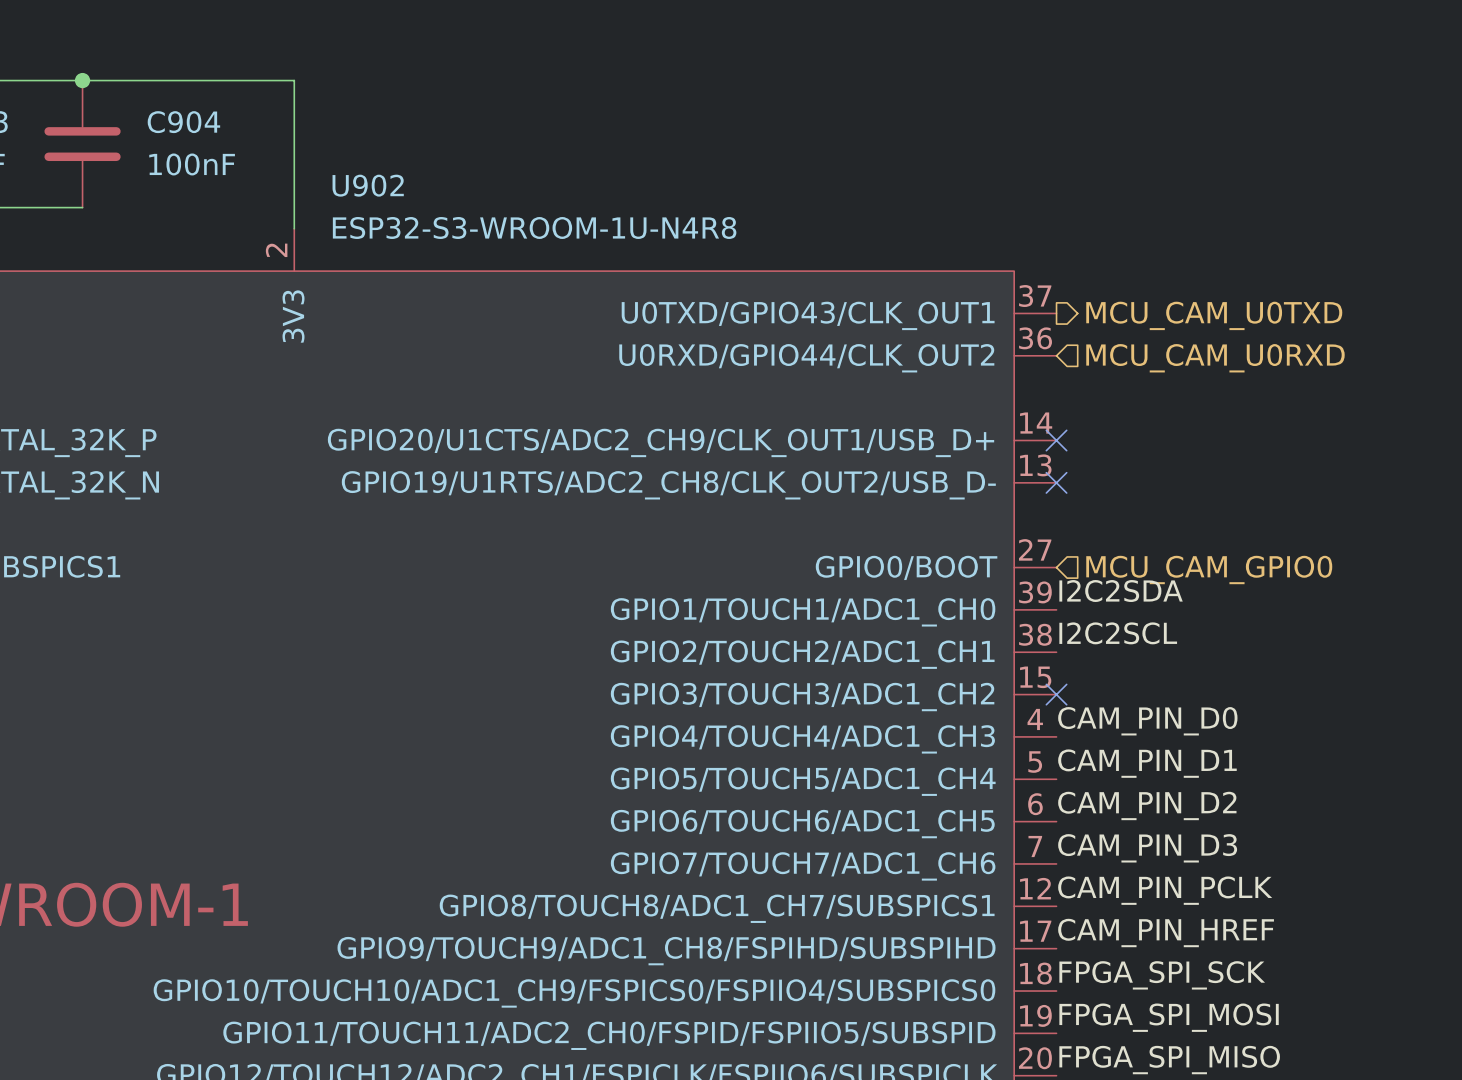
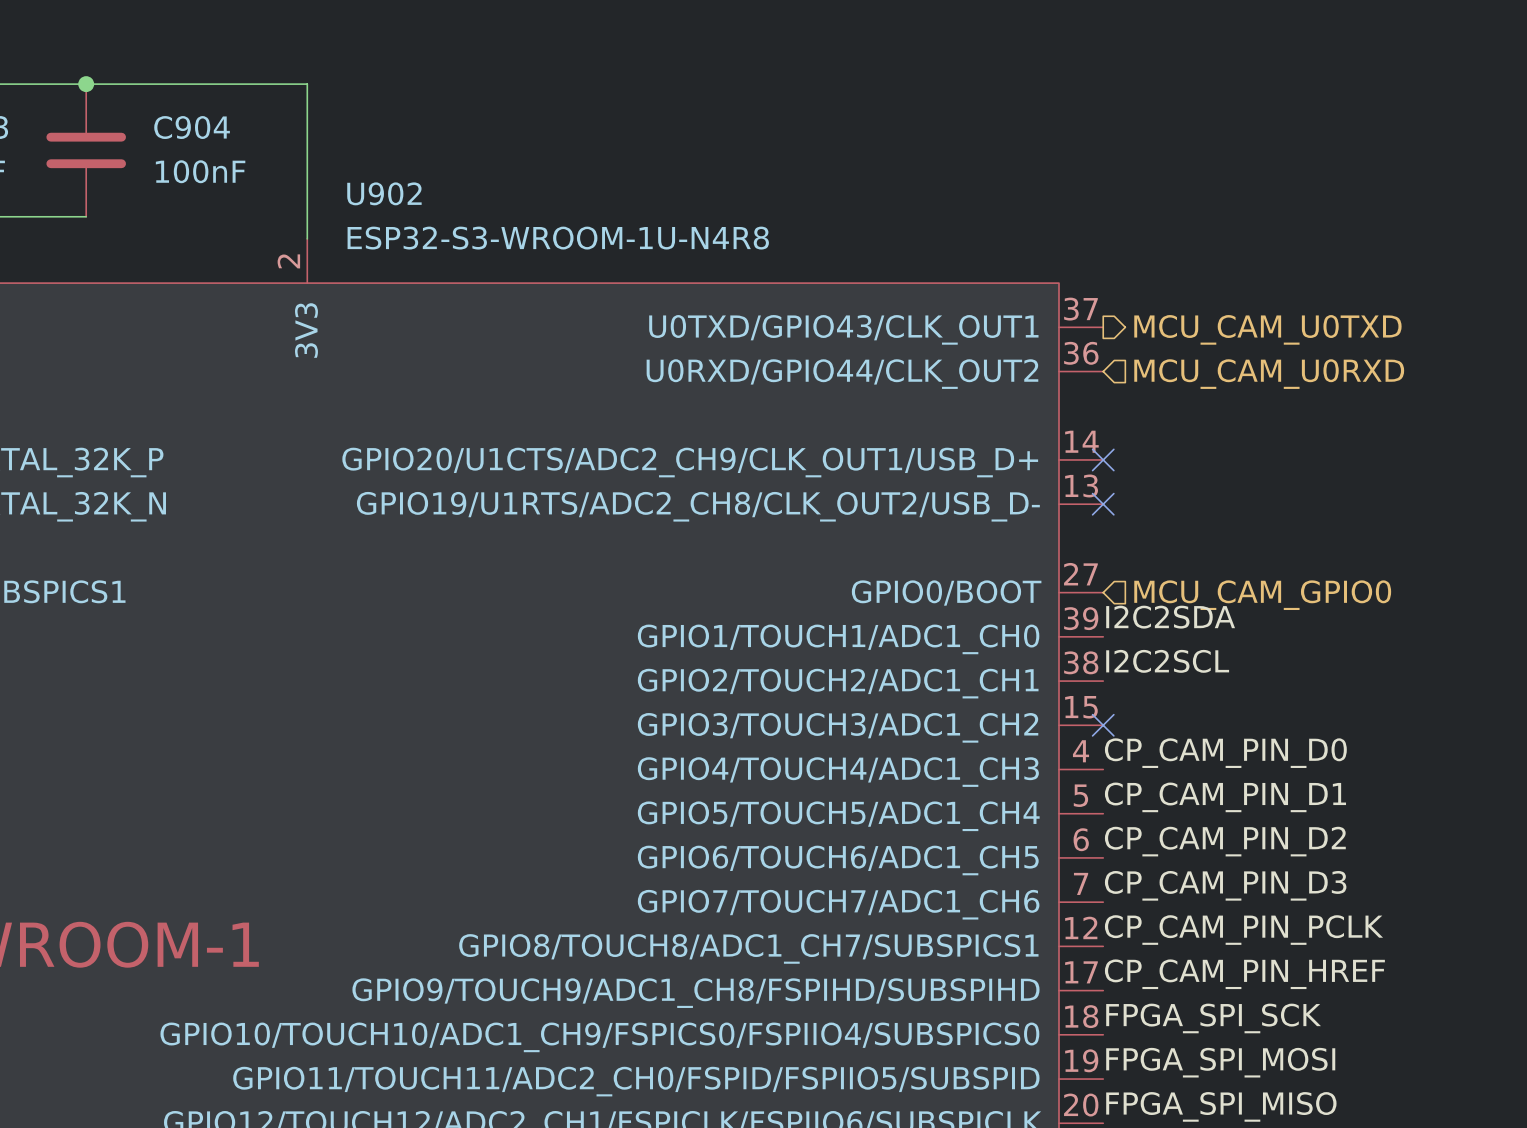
label: CAM_PIN_D0 (1147, 721) -> CP_CAM_PIN_D0 (1225, 753)
label: CAM_PIN_D1 (1147, 763) -> CP_CAM_PIN_D1 (1225, 797)
label: CAM_PIN_D2 (1147, 805) -> CP_CAM_PIN_D2 (1225, 841)
label: CAM_PIN_D3 (1147, 848) -> CP_CAM_PIN_D3 (1225, 885)
label: CAM_PIN_PCLK (1165, 890) -> CP_CAM_PIN_PCLK (1243, 930)
label: CAM_PIN_HREF (1166, 933) -> CP_CAM_PIN_HREF (1244, 974)

